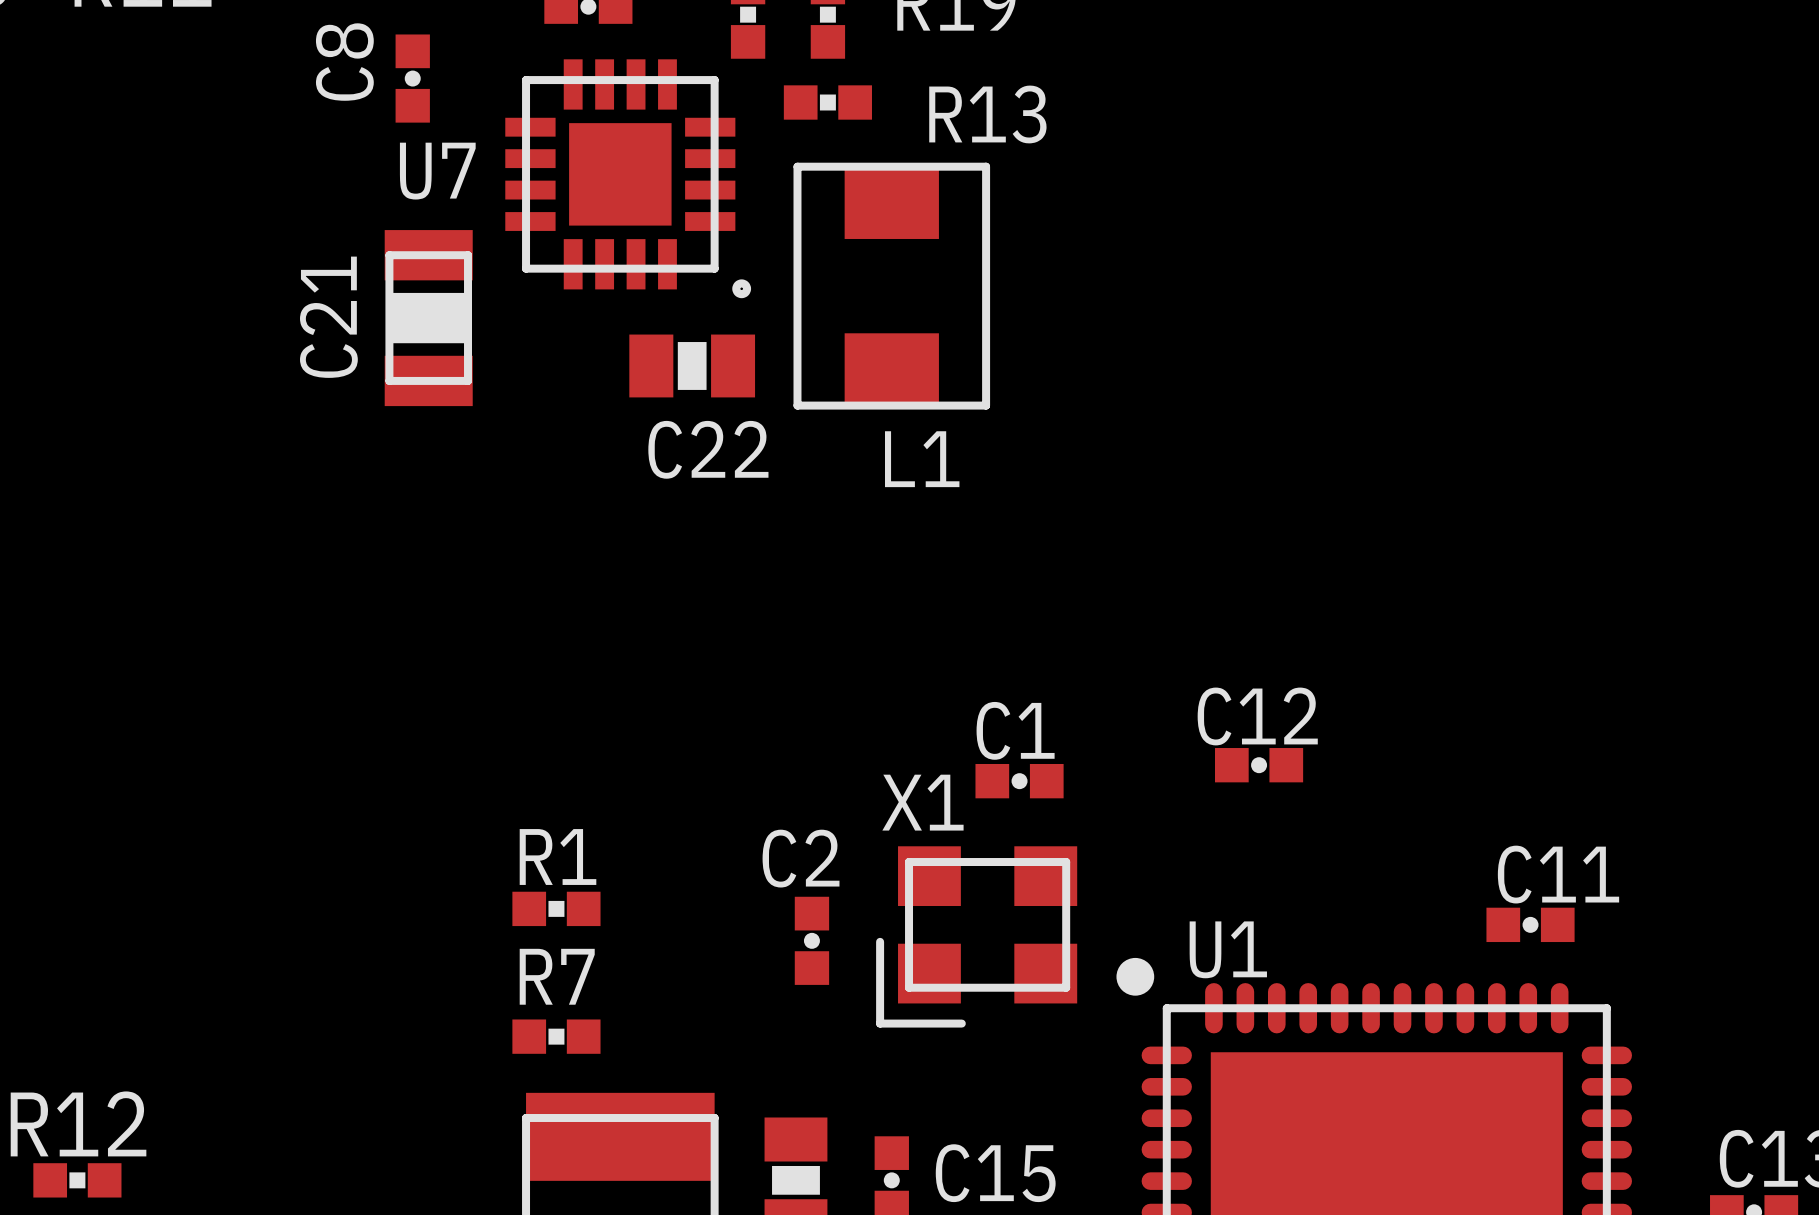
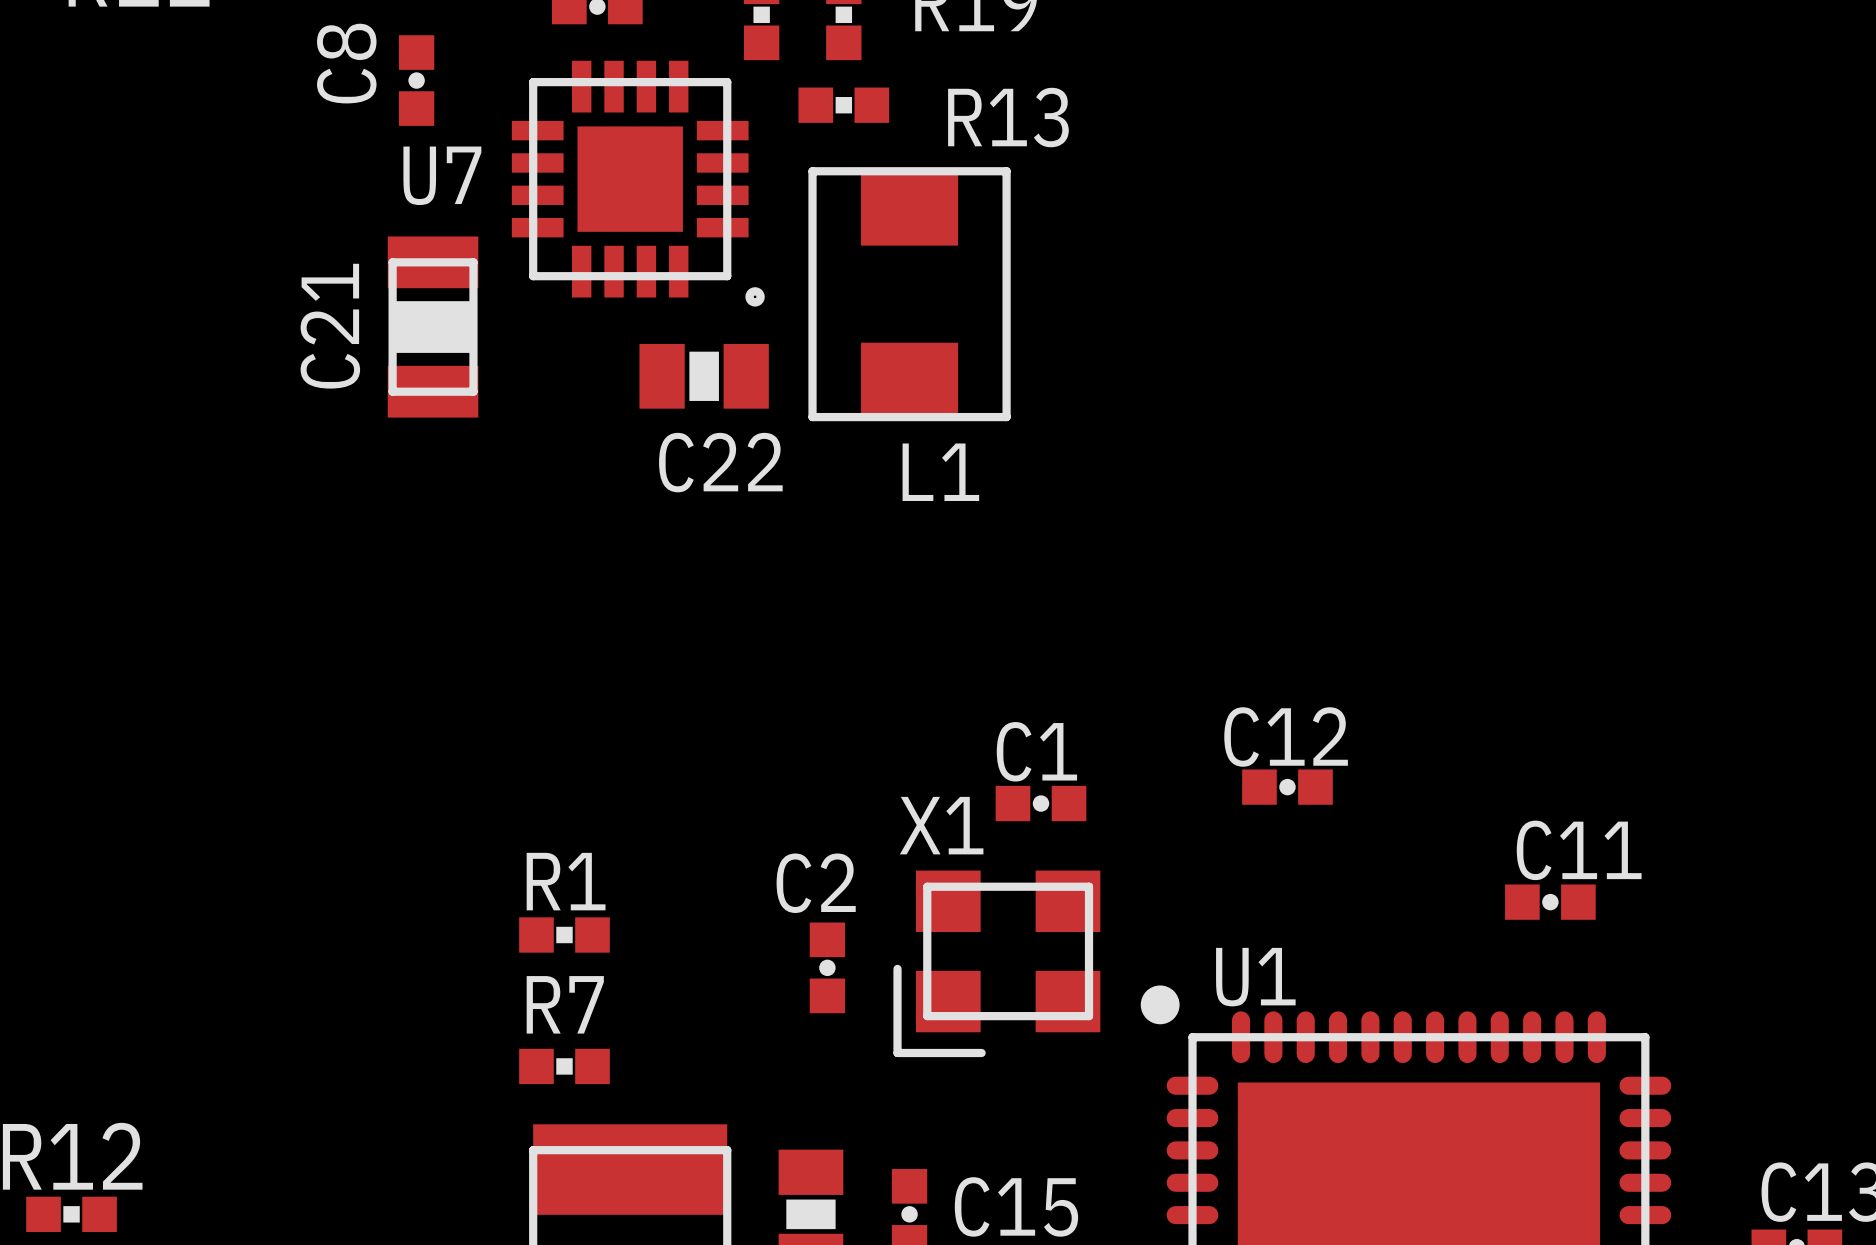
C11 position: (1530, 924) -> (1550, 902)

